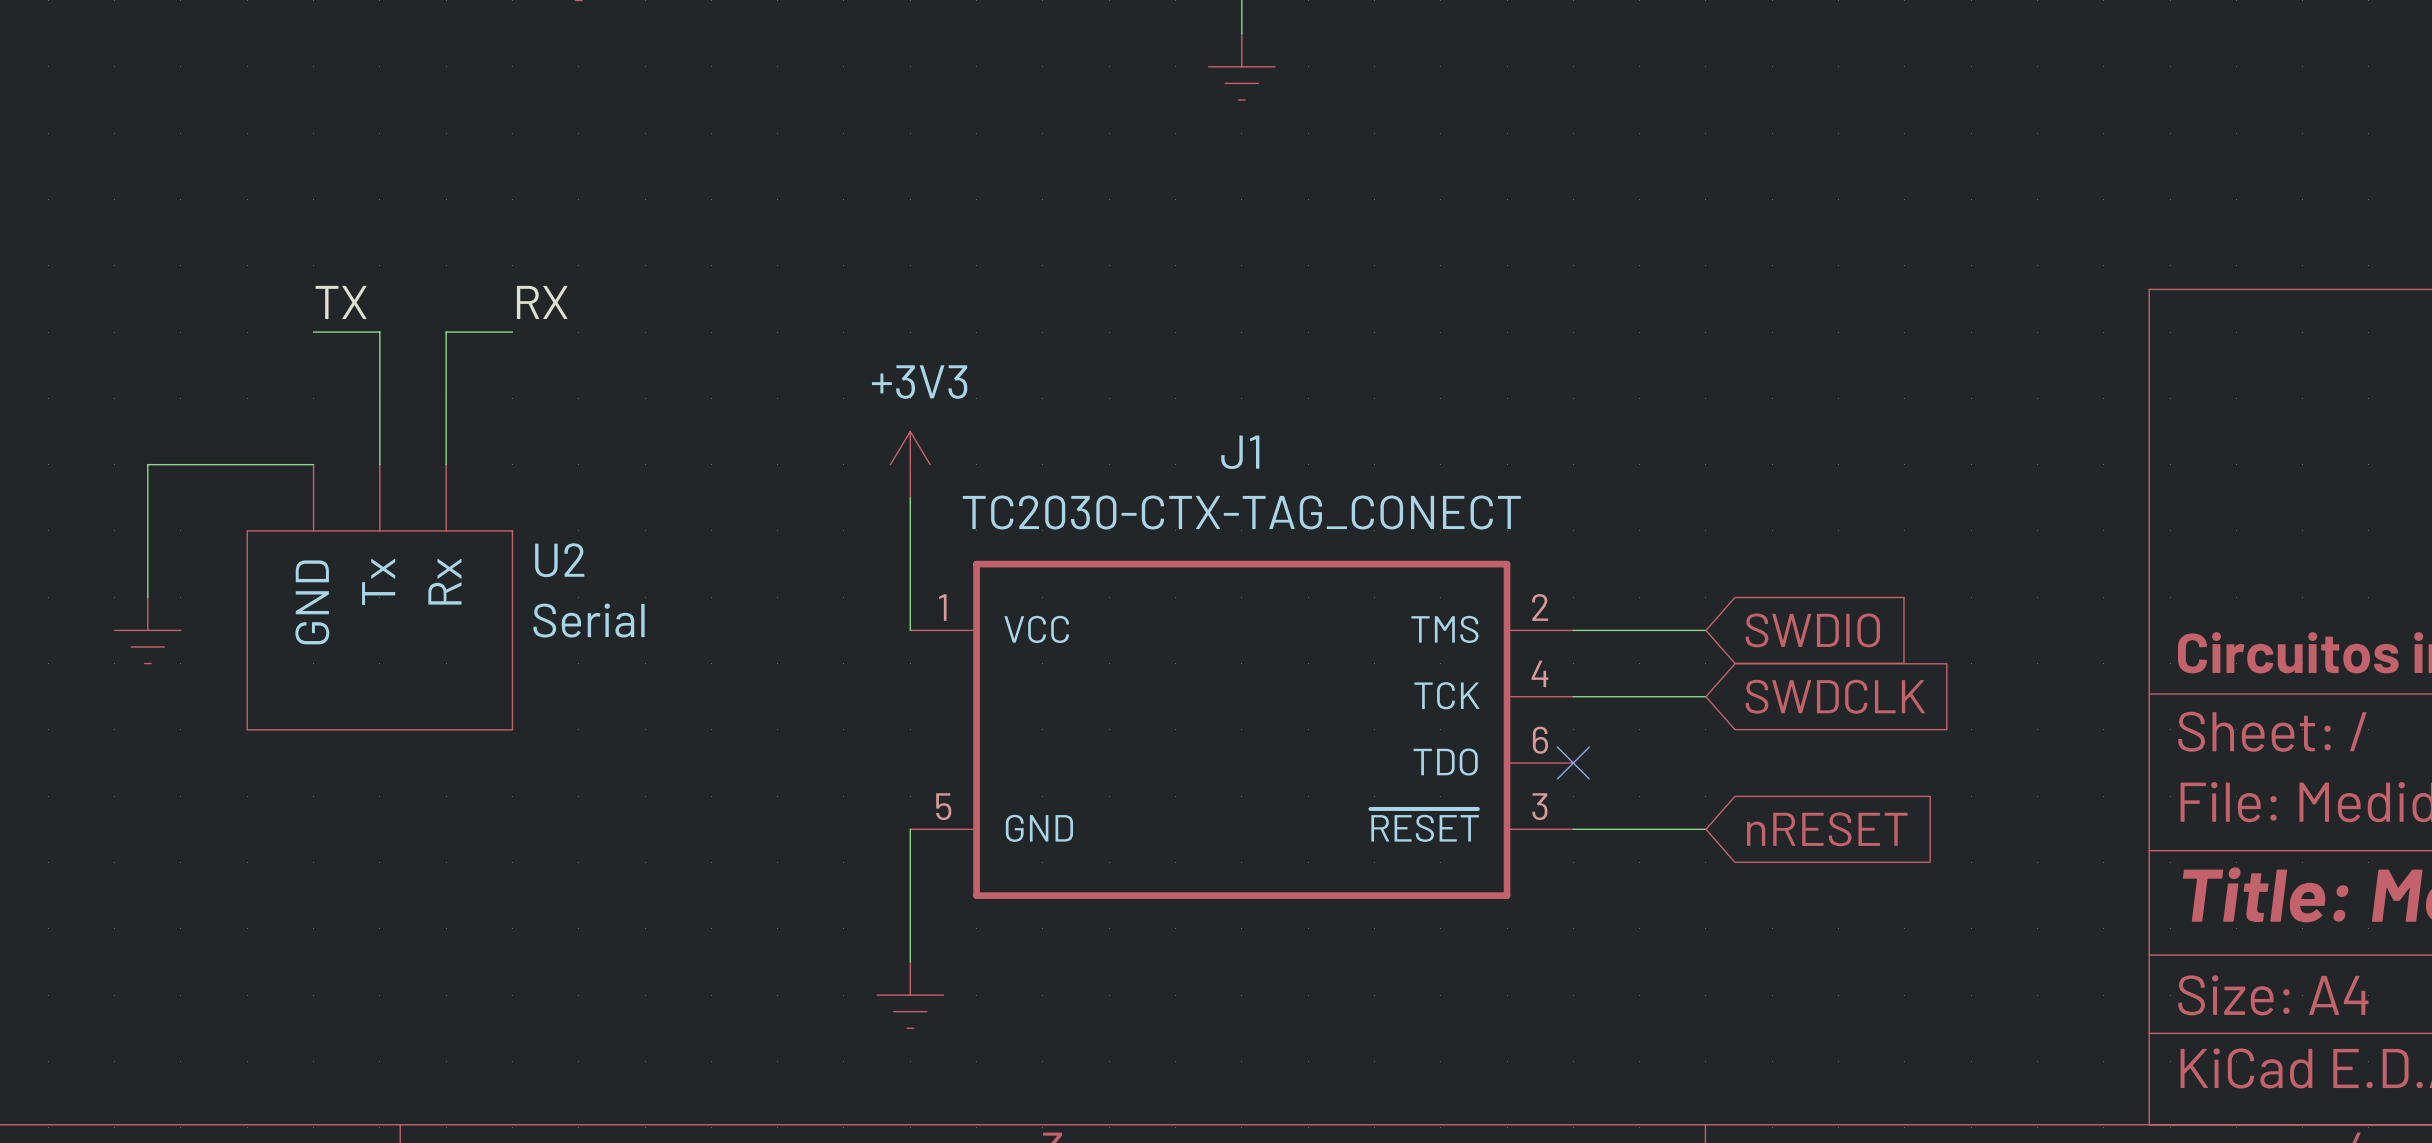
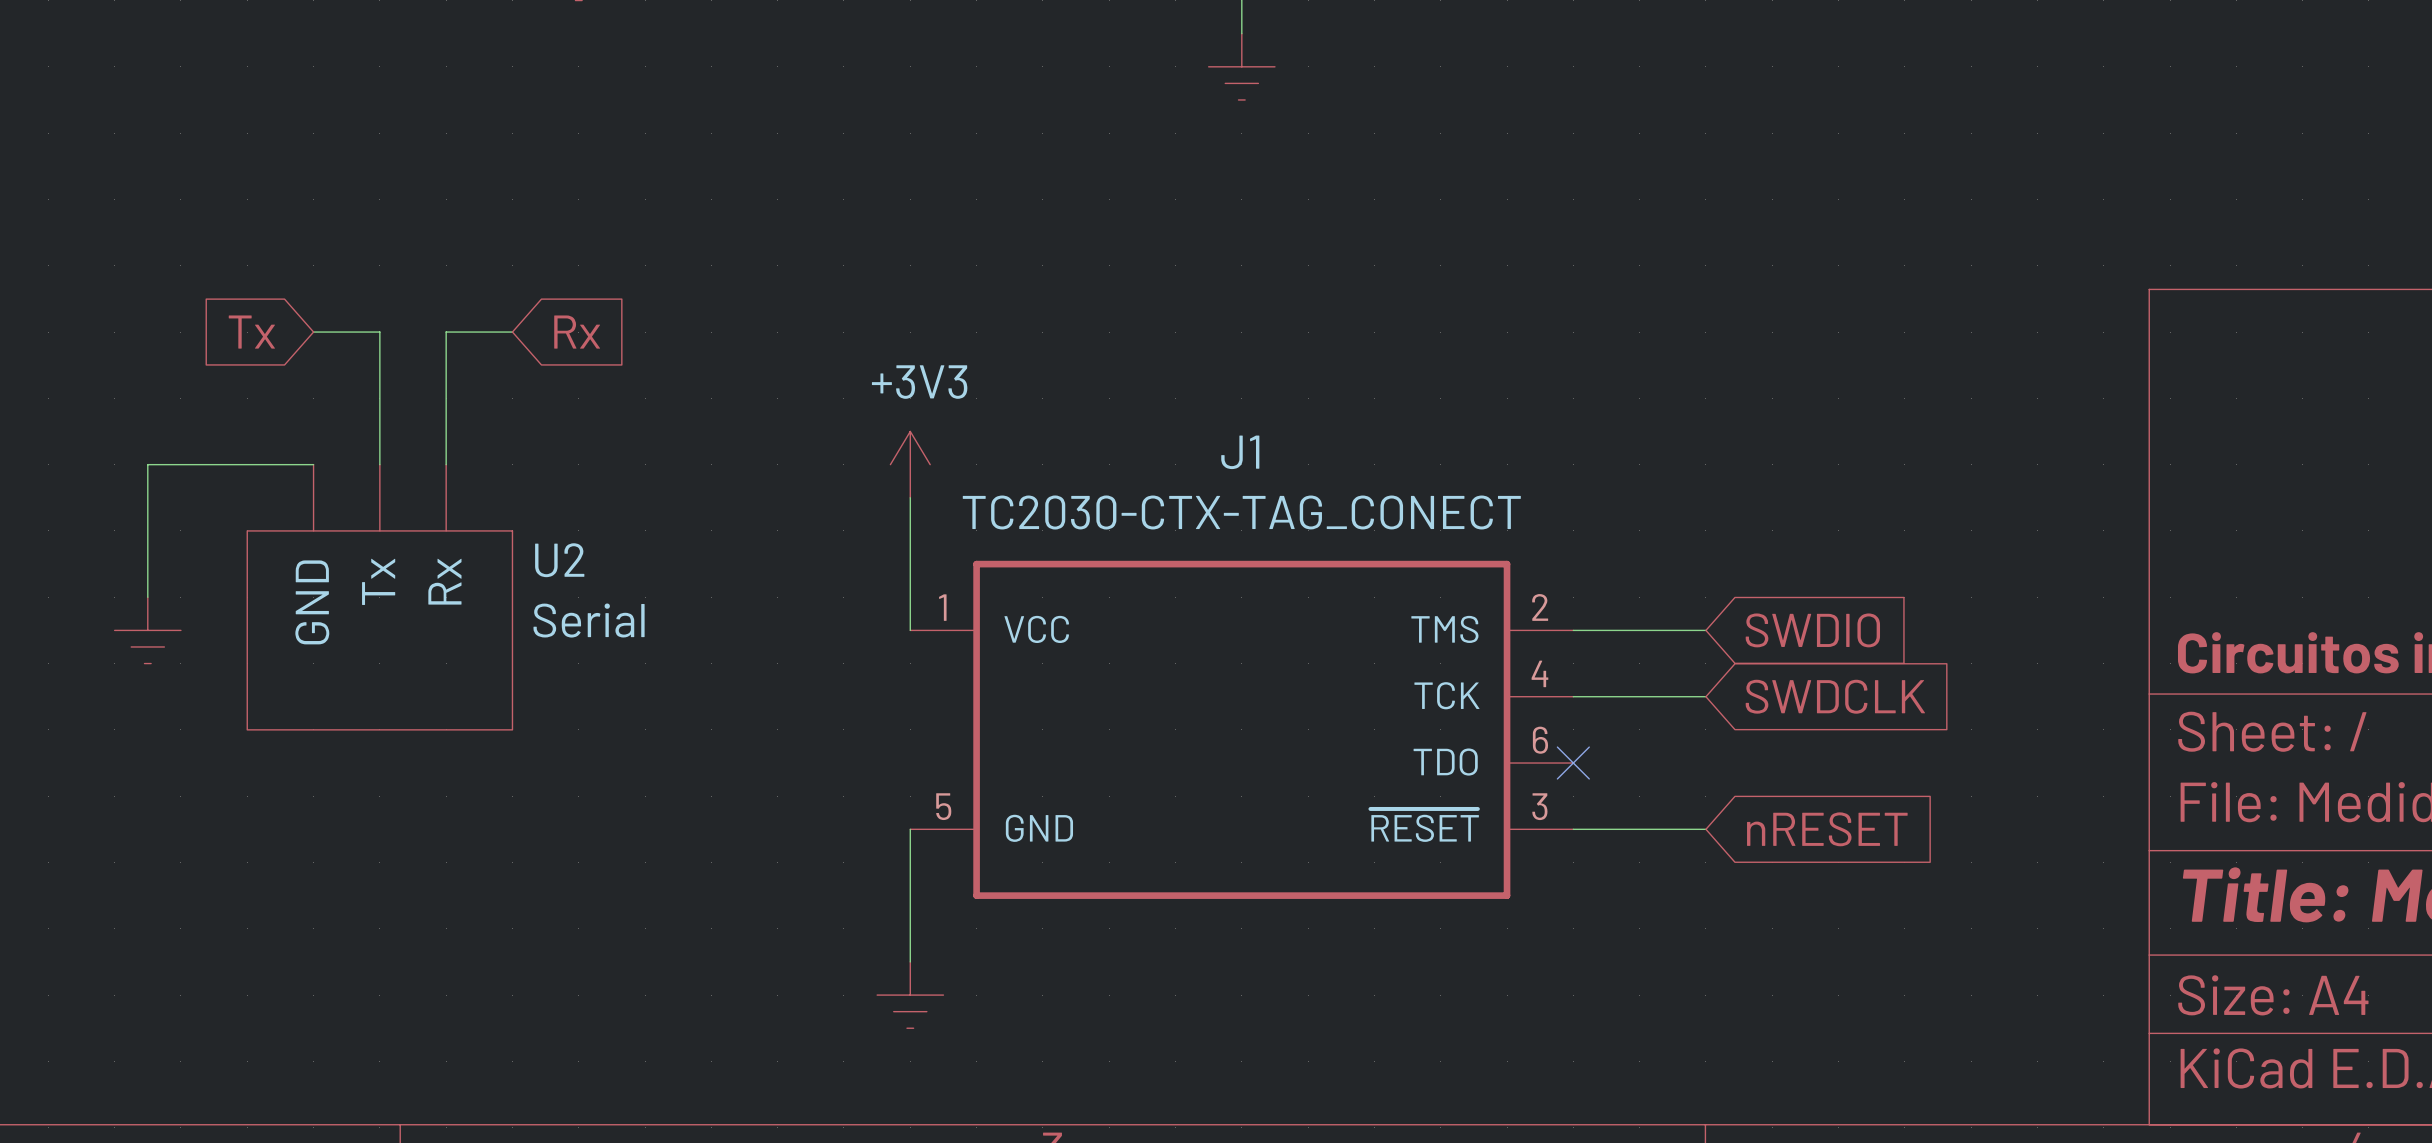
label: TX (341, 302) -> none
label: RX (542, 302) -> none
global label: none -> Tx (251, 332)
global label: none -> Rx (577, 332)

